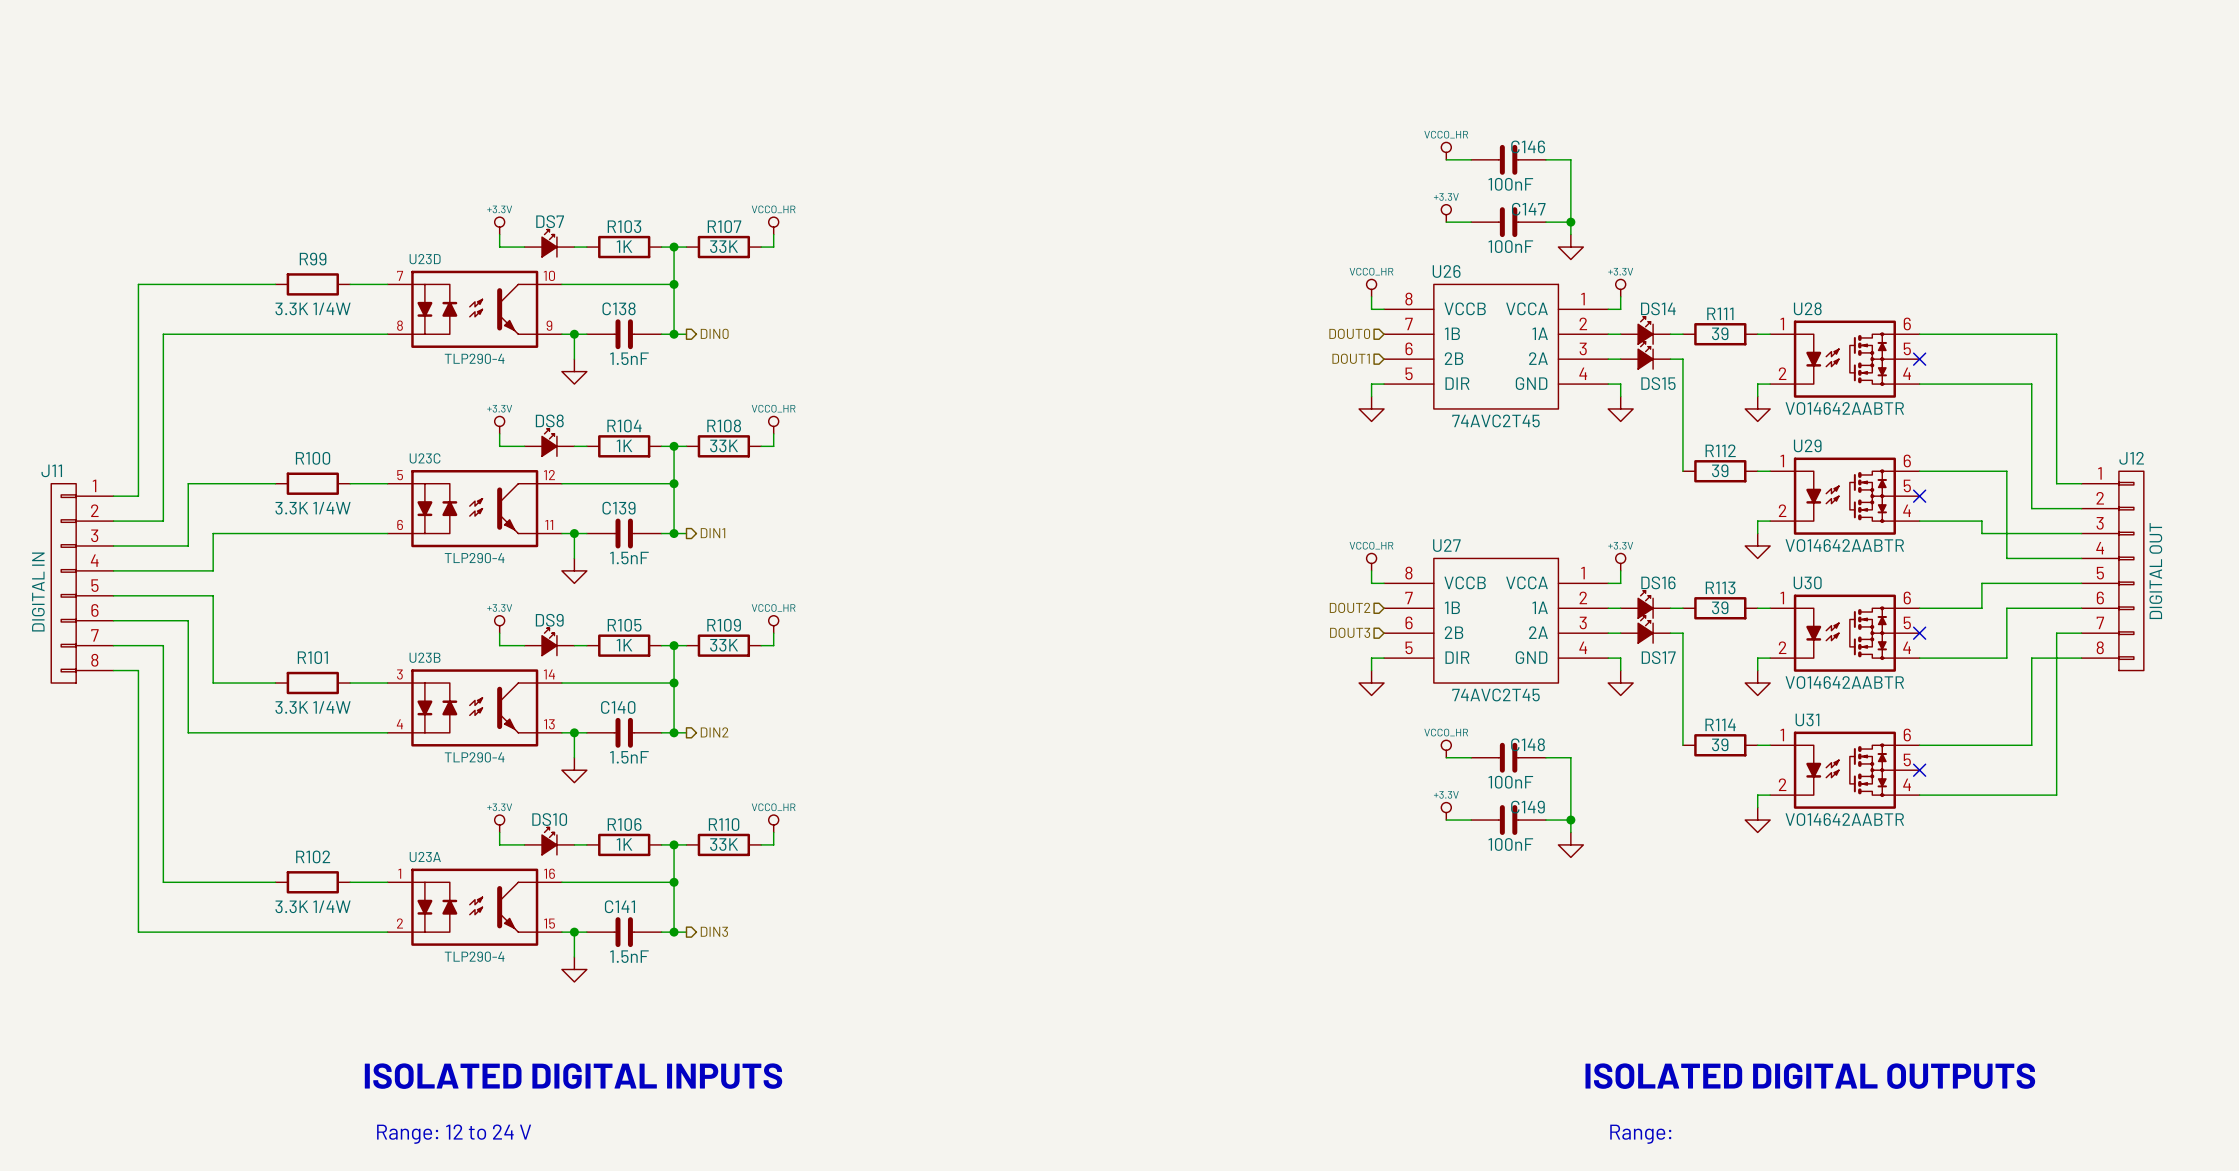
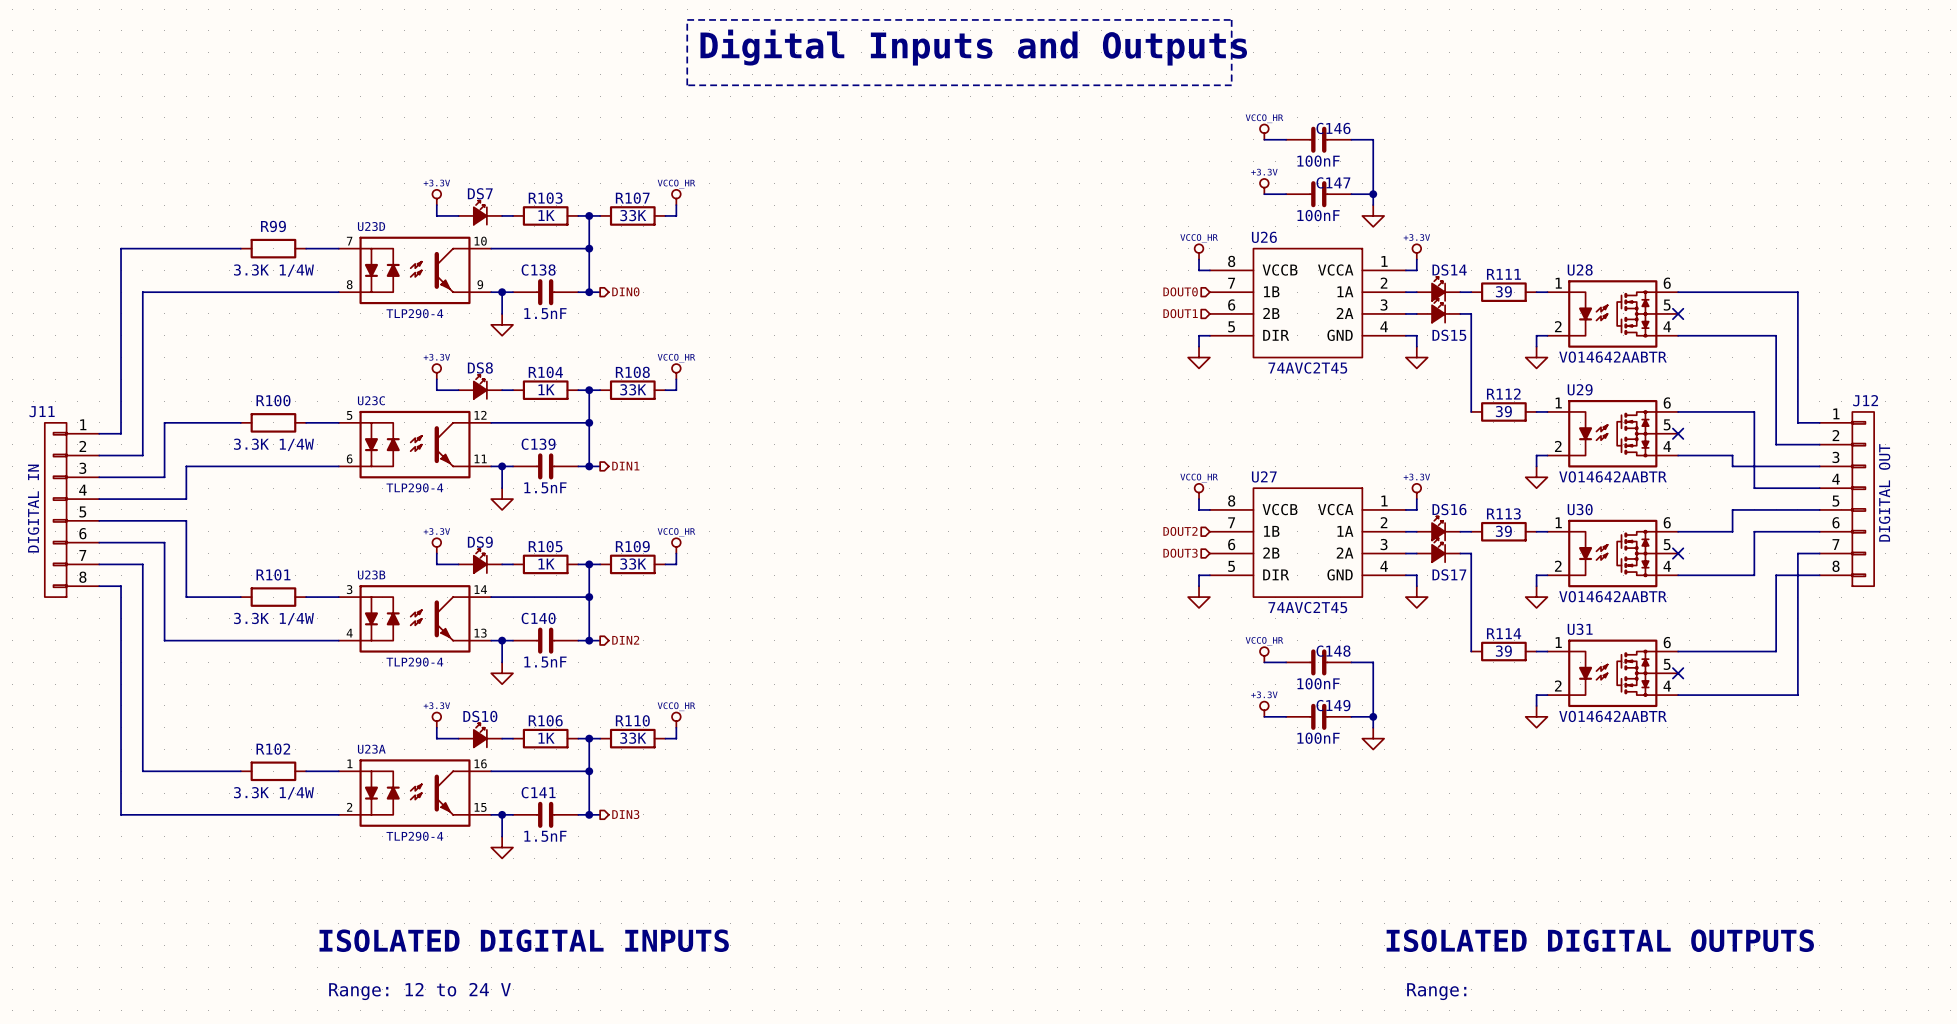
line: none -> (687, 19) (1231, 19) (1231, 85) (687, 85) (687, 19)
text: none -> Digital Inputs and Outputs (973, 47)

